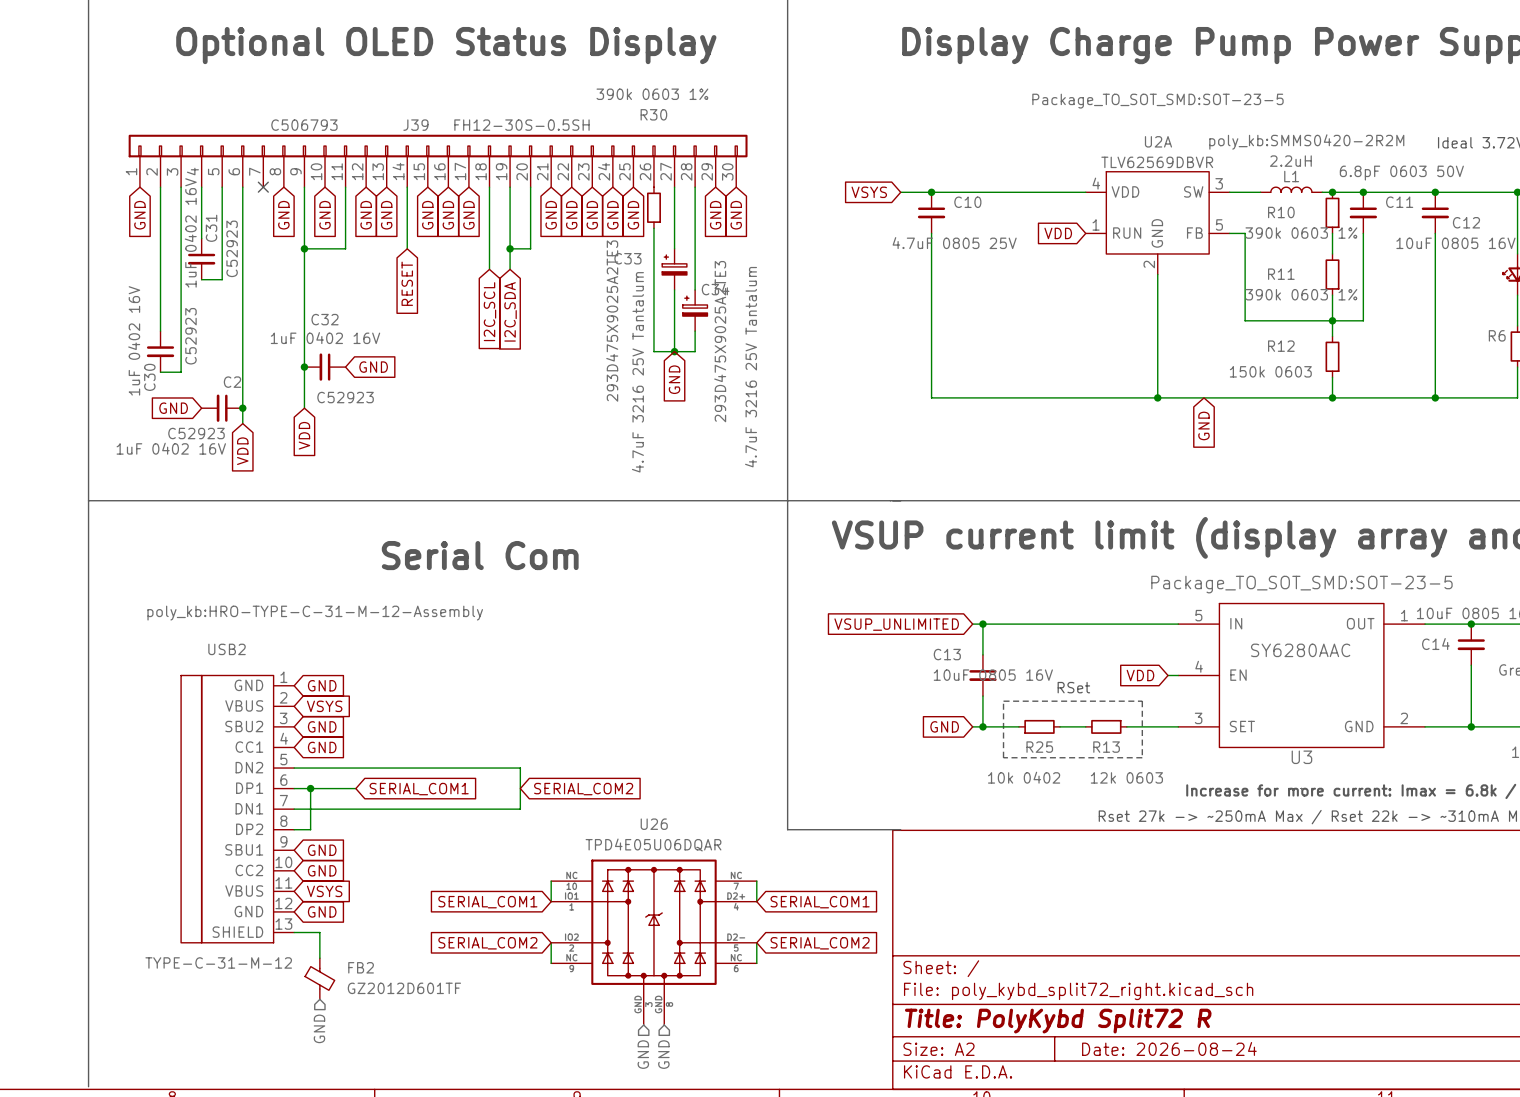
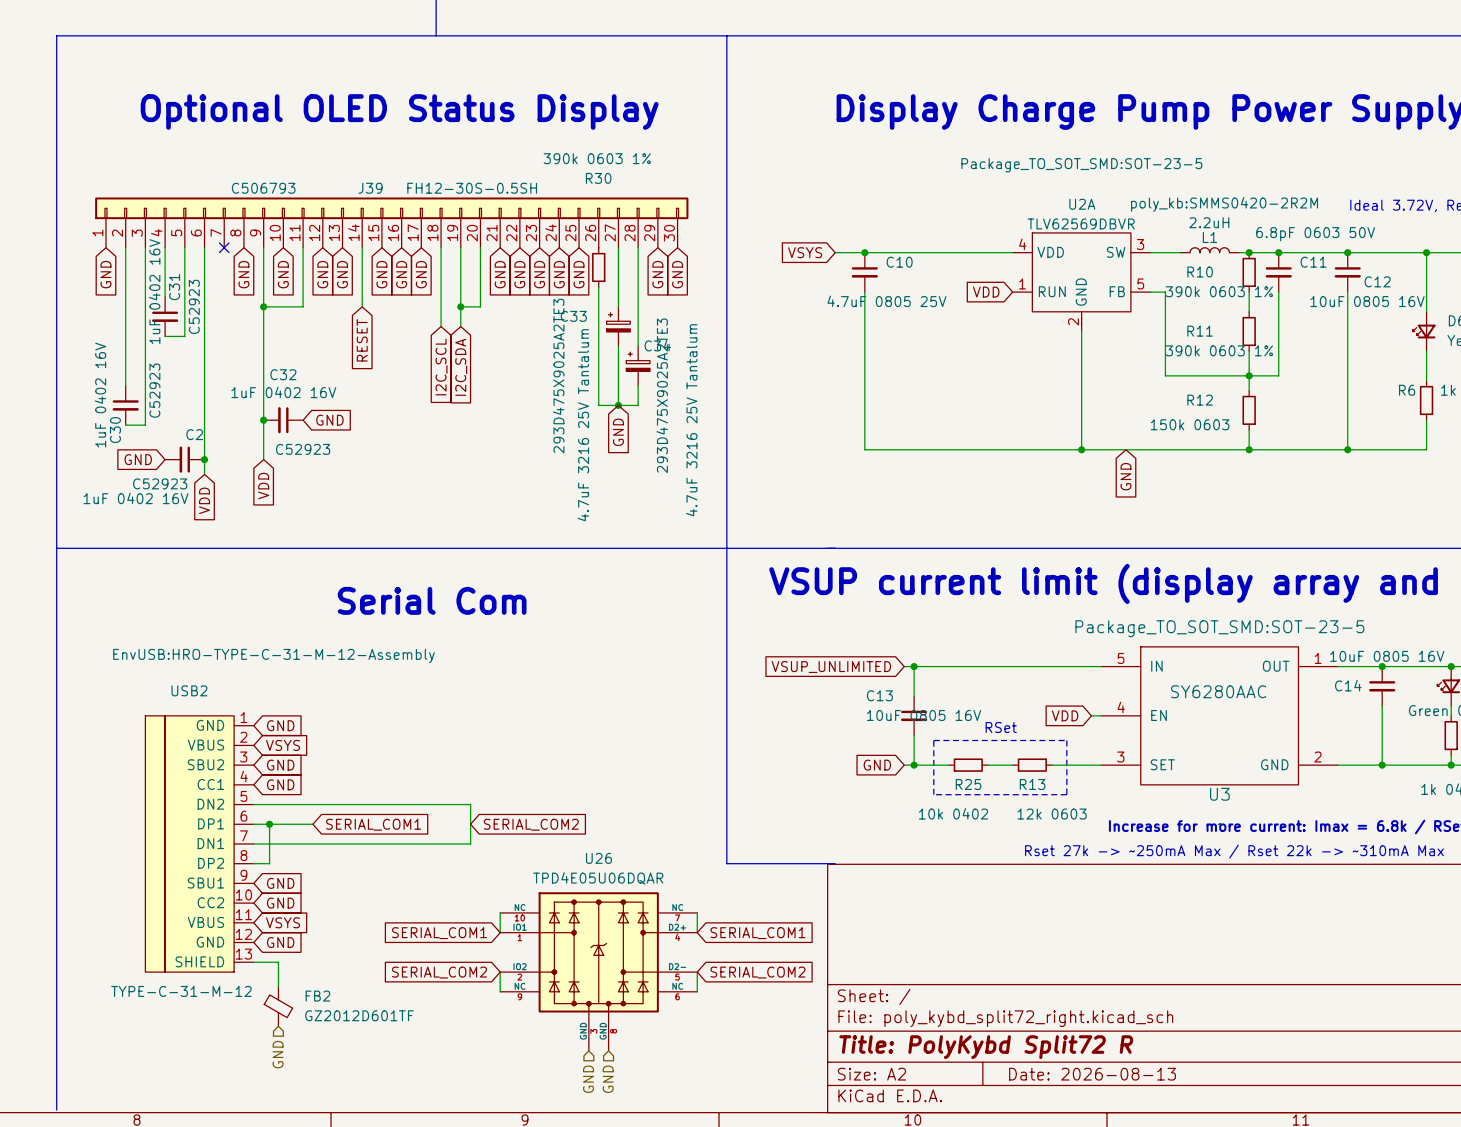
USB2 text: poly_kb:HRO-TYPE-C-31-M-12-Assembly (315, 613) -> EnvUSB:HRO-TYPE-C-31-M-12-Assembly (273, 656)
title block: Date: 2026-08-24 (1169, 1048) -> Date: 2026-08-13 (1092, 1074)

